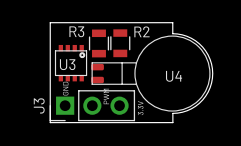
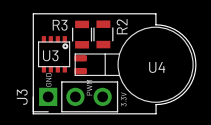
R3 name: R3 (76, 31) -> R2 (122, 26)
R2 name: R2 (141, 31) -> R3 (60, 25)

